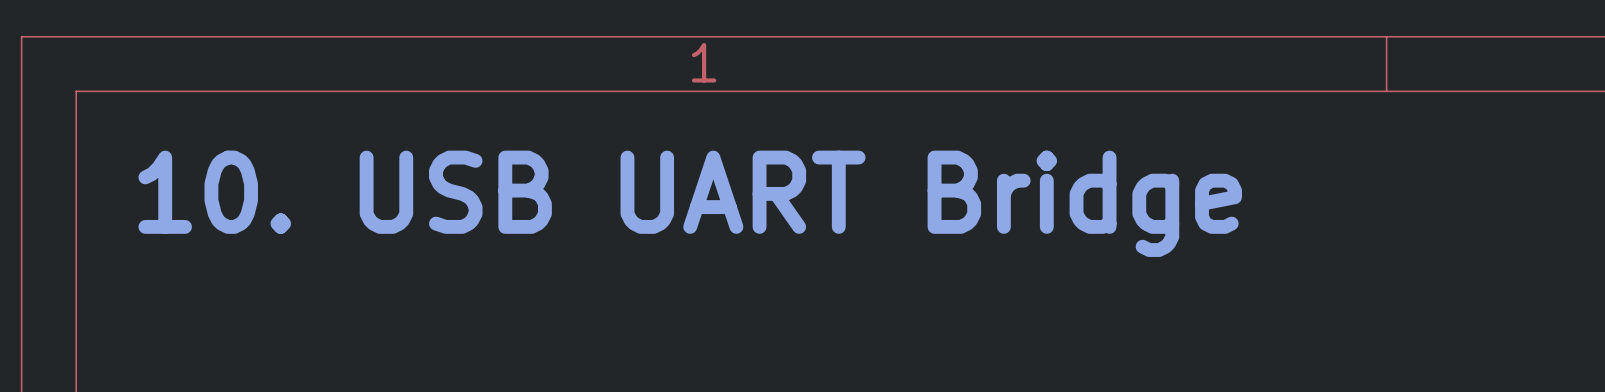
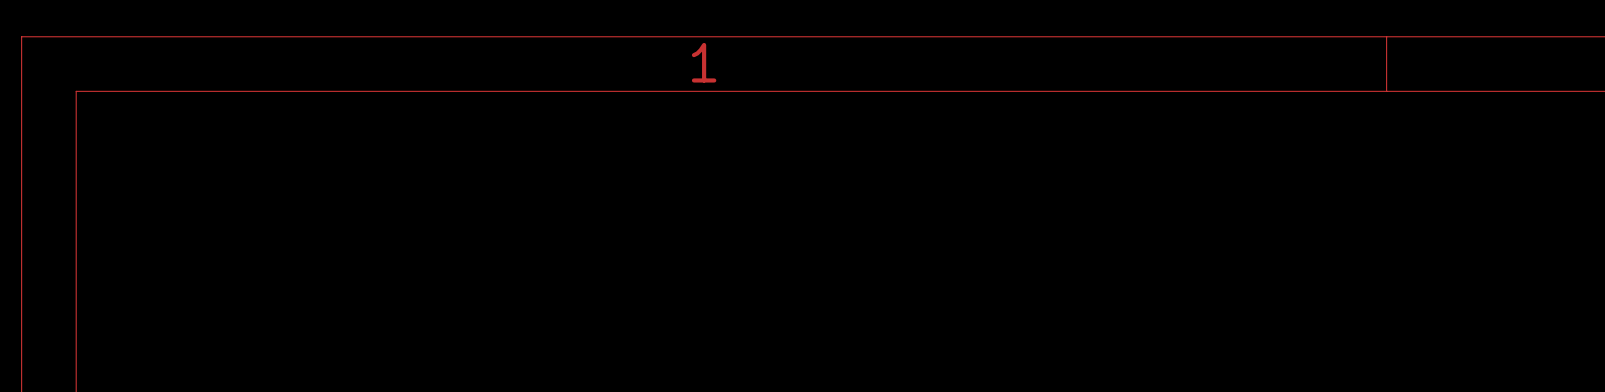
text: 10. USB UART Bridge (690, 203) -> none

